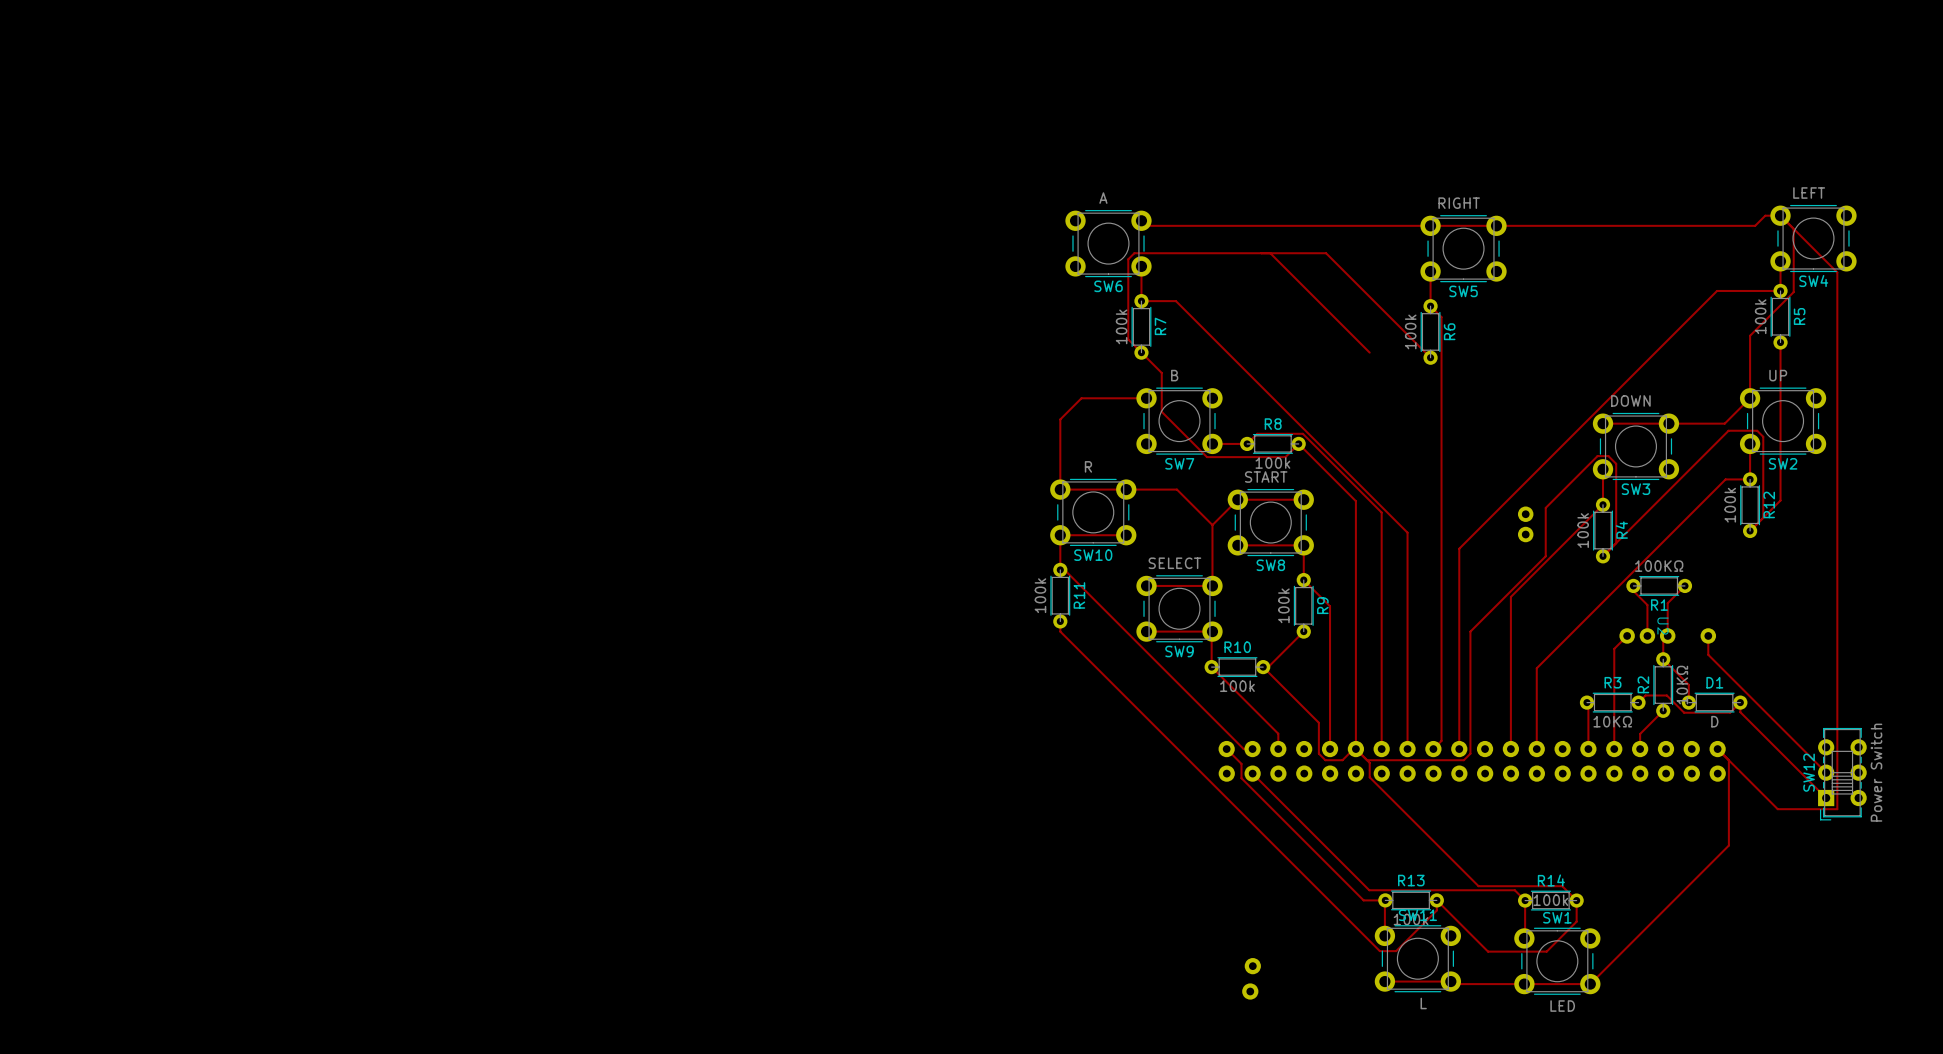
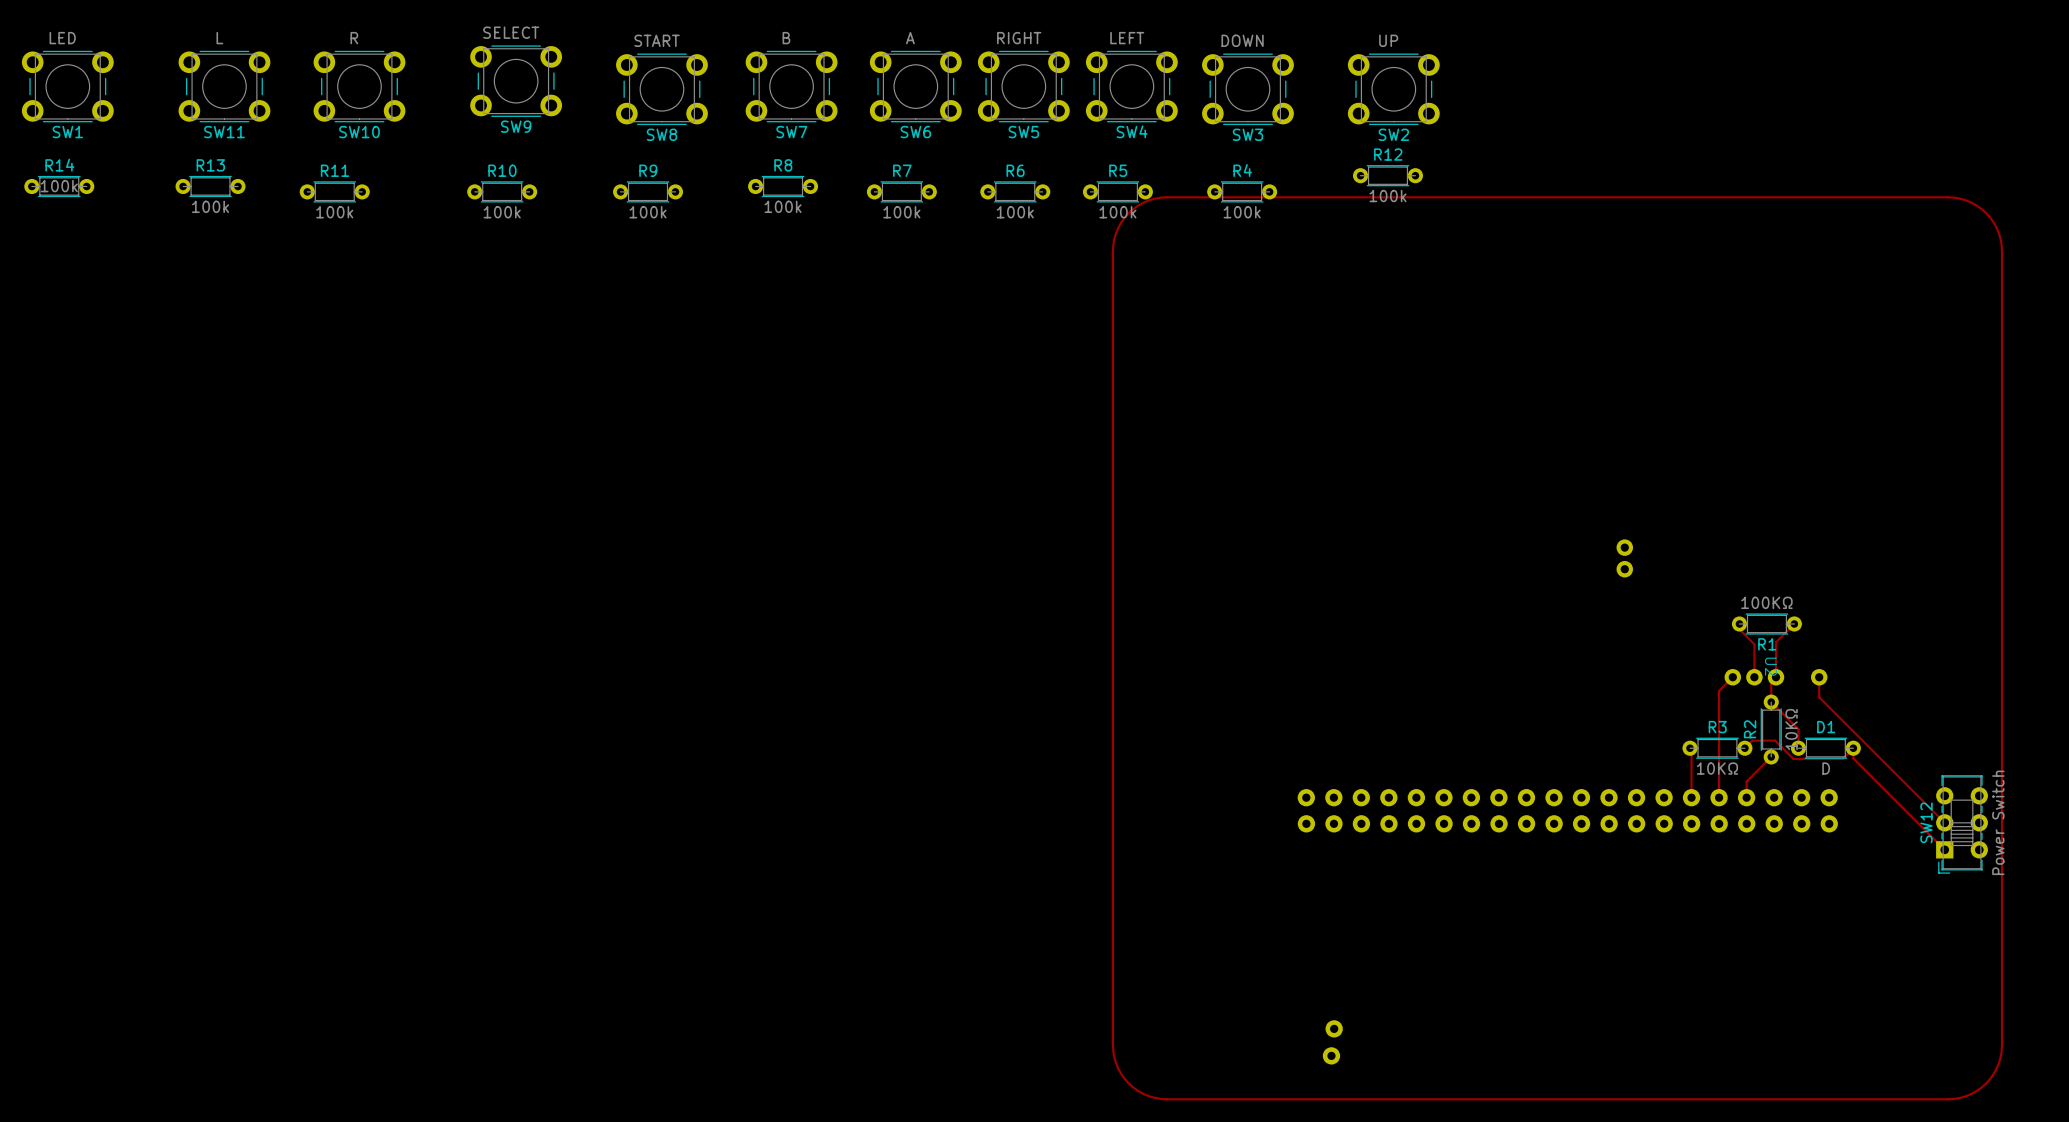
track: none -> (1166, 197) (1947, 197) (1971, 202) (1986, 213) (1998, 233) (2001, 251) (2001, 1045) (1996, 1068) (1986, 1083) (1971, 1093) (1947, 1099) (1166, 1099) (1143, 1093) (1128, 1083) (1118, 1068) (1112, 1045) (1112, 251) (1115, 233) (1128, 213) (1149, 200) (1166, 197)
track: (1141, 220) (1146, 225) (1755, 225) (1765, 215) (1780, 215) (1837, 272) (1837, 809) (1777, 809) (1717, 749) -> none
track: (1793, 228) (1793, 292) (1750, 335) (1750, 398) (1724, 423) (1603, 423) -> none
SW4 position: (1813, 238) -> (1131, 86)
SW6 position: (1108, 243) -> (915, 86)
SW5 position: (1463, 248) -> (1023, 86)
track: (1270, 253) (1369, 352) -> none
track: (1780, 261) (1780, 290) (1717, 290) (1459, 548) (1459, 749) -> none
track: (1141, 266) (1141, 301) (1175, 301) (1407, 532) (1407, 749) -> none
track: (1430, 271) (1430, 306) (1441, 317) (1441, 740) (1433, 749) -> none
R5 value position: 100k (1760, 316) -> 100k (1117, 212)
R5 rotation: 0° (1780, 316) -> 90° clockwise (1117, 191)
R5 position: (1780, 316) -> (1117, 191)
R5 name position: R5 (1799, 316) -> R5 (1118, 170)
R7 value position: 100k (1121, 326) -> 100k (901, 212)
R7 rotation: 0° (1141, 326) -> 90° clockwise (901, 191)
R7 position: (1141, 326) -> (901, 191)
R7 name position: R7 (1160, 326) -> R7 (902, 170)
R6 value position: 100k (1410, 331) -> 100k (1015, 212)
R6 rotation: 0° (1430, 331) -> 90° clockwise (1015, 191)
R6 position: (1430, 331) -> (1015, 191)
R6 name position: R6 (1449, 331) -> R6 (1015, 170)
track: (1780, 342) (1780, 500) (1750, 530) -> none
track: (1430, 357) (1326, 253) (1134, 253) (1128, 259) (1128, 339) (1161, 372) (1161, 411) (1207, 457) (1285, 457) (1298, 443) (1355, 501) (1355, 749) -> none
track: (1146, 398) (1081, 398) (1060, 419) (1060, 489) (1176, 489) (1212, 525) -> none
SW7 position: (1179, 421) -> (791, 86)
SW2 position: (1783, 421) -> (1393, 89)
track: (1212, 443) (1247, 443) (1257, 433) (1302, 433) (1381, 512) (1381, 749) -> none
R8 position: (1272, 443) -> (783, 186)
track: (1750, 443) (1750, 479) (1725, 479) (1536, 668) (1536, 749) -> none
SW3 position: (1635, 446) -> (1247, 89)
track: (1603, 469) (1603, 504) (1510, 596) (1510, 749) -> none
track: (1303, 499) (1237, 499) (1212, 525) -> none
R12 name position: R12 (1769, 504) -> R12 (1388, 154)
R12 value position: 100k (1730, 505) -> 100k (1387, 196)
R12 rotation: 0° (1750, 505) -> 90° clockwise (1387, 175)
R12 position: (1750, 505) -> (1387, 175)
SW10 position: (1093, 512) -> (359, 86)
track: (1763, 517) (1763, 436) (1757, 430) (1728, 430) (1603, 556) -> none
SW8 position: (1270, 522) -> (661, 89)
track: (1212, 525) (1212, 585) (1146, 585) -> none
R4 value position: 100k (1583, 530) -> 100k (1242, 212)
R4 rotation: 0° (1603, 530) -> 90° clockwise (1242, 191)
R4 position: (1603, 530) -> (1242, 191)
R4 name position: R4 (1621, 530) -> R4 (1242, 170)
track: (1126, 535) (1060, 535) (1060, 569) (1064, 569) (1243, 749) (1252, 749) -> none
track: (1616, 543) (1616, 463) (1608, 456) (1597, 456) (1545, 507) (1545, 556) (1470, 631) (1470, 753) (1463, 760) (1367, 760) -> none
track: (1237, 545) (1303, 545) (1303, 580) (1330, 606) (1330, 749) -> none
R11 value position: 100k (1040, 595) -> 100k (334, 212)
R11 rotation: 0° (1060, 595) -> 90° clockwise (334, 191)
R11 position: (1060, 595) -> (334, 191)
R11 name position: R11 (1079, 595) -> R11 (335, 170)
R9 value position: 100k (1283, 605) -> 100k (648, 212)
R9 rotation: 0° (1303, 605) -> 90° clockwise (648, 191)
R9 position: (1303, 605) -> (648, 191)
R9 name position: R9 (1322, 605) -> R9 (648, 170)
SW9 position: (1179, 608) -> (516, 81)
track: (1060, 621) (1060, 631) (1379, 951) (1396, 951) (1436, 910) (1436, 900) (1488, 951) (1546, 951) (1576, 921) (1576, 900) (1562, 886) (1478, 886) (1369, 777) (1369, 762) (1355, 749) -> none
track: (1146, 631) (1212, 631) (1211, 667) (1278, 733) (1278, 749) -> none
track: (1303, 631) (1268, 667) (1263, 667) (1318, 722) (1318, 753) (1325, 760) (1342, 760) (1355, 749) -> none
R10 position: (1237, 667) -> (502, 191)
track: (1226, 749) (1241, 763) (1241, 778) (1363, 900) (1385, 900) (1384, 935) -> none
track: (1728, 760) (1728, 845) (1590, 984) (1453, 984) (1450, 981) (1384, 981) -> none
track: (1252, 773) (1369, 890) (1514, 890) (1525, 900) (1524, 938) -> none
R13 position: (1411, 900) -> (210, 186)
R14 position: (1550, 900) -> (59, 186)
SW11 rotation: 0° (1417, 958) -> 180° (224, 86)
SW11 position: (1417, 958) -> (224, 86)
SW1 rotation: 0° (1557, 961) -> 180° (67, 86)
SW1 position: (1557, 961) -> (67, 86)

